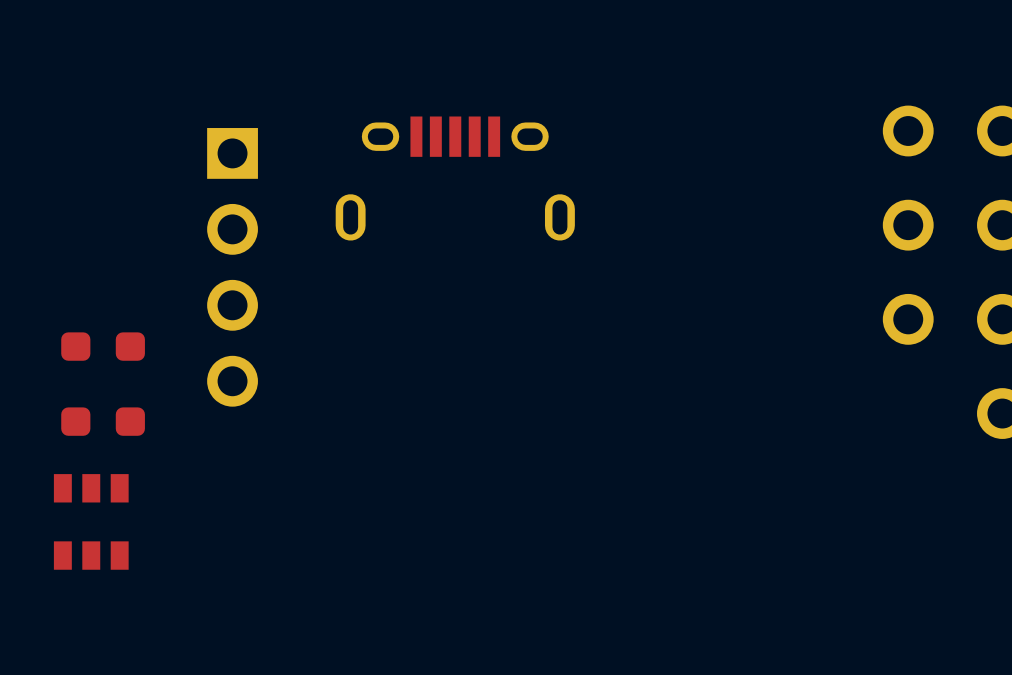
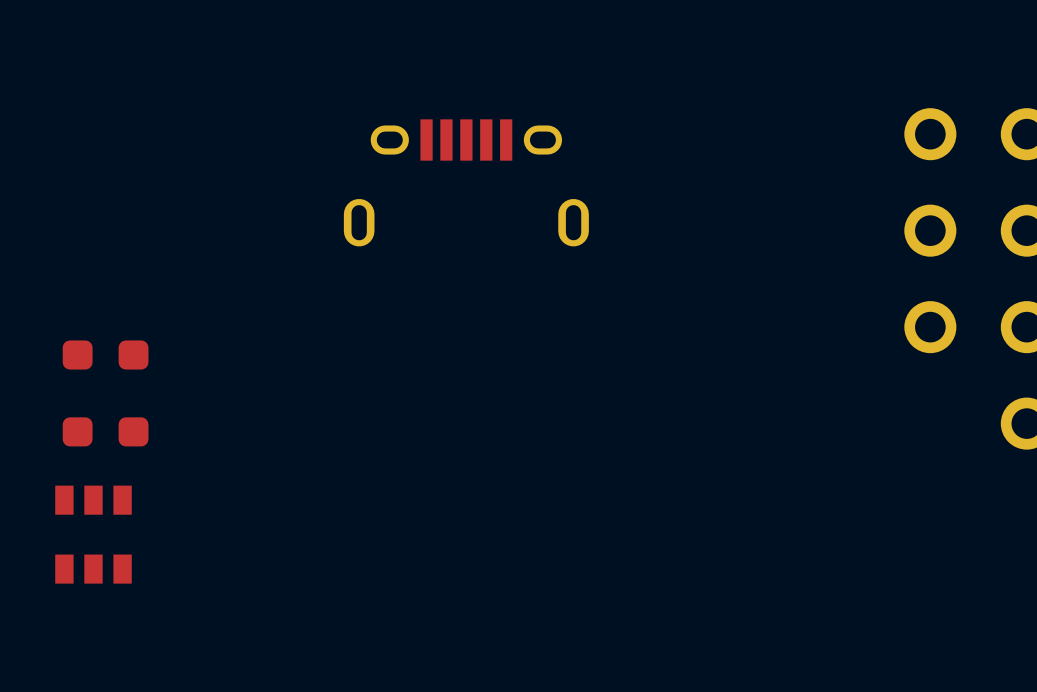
part: (232, 267) -> none

